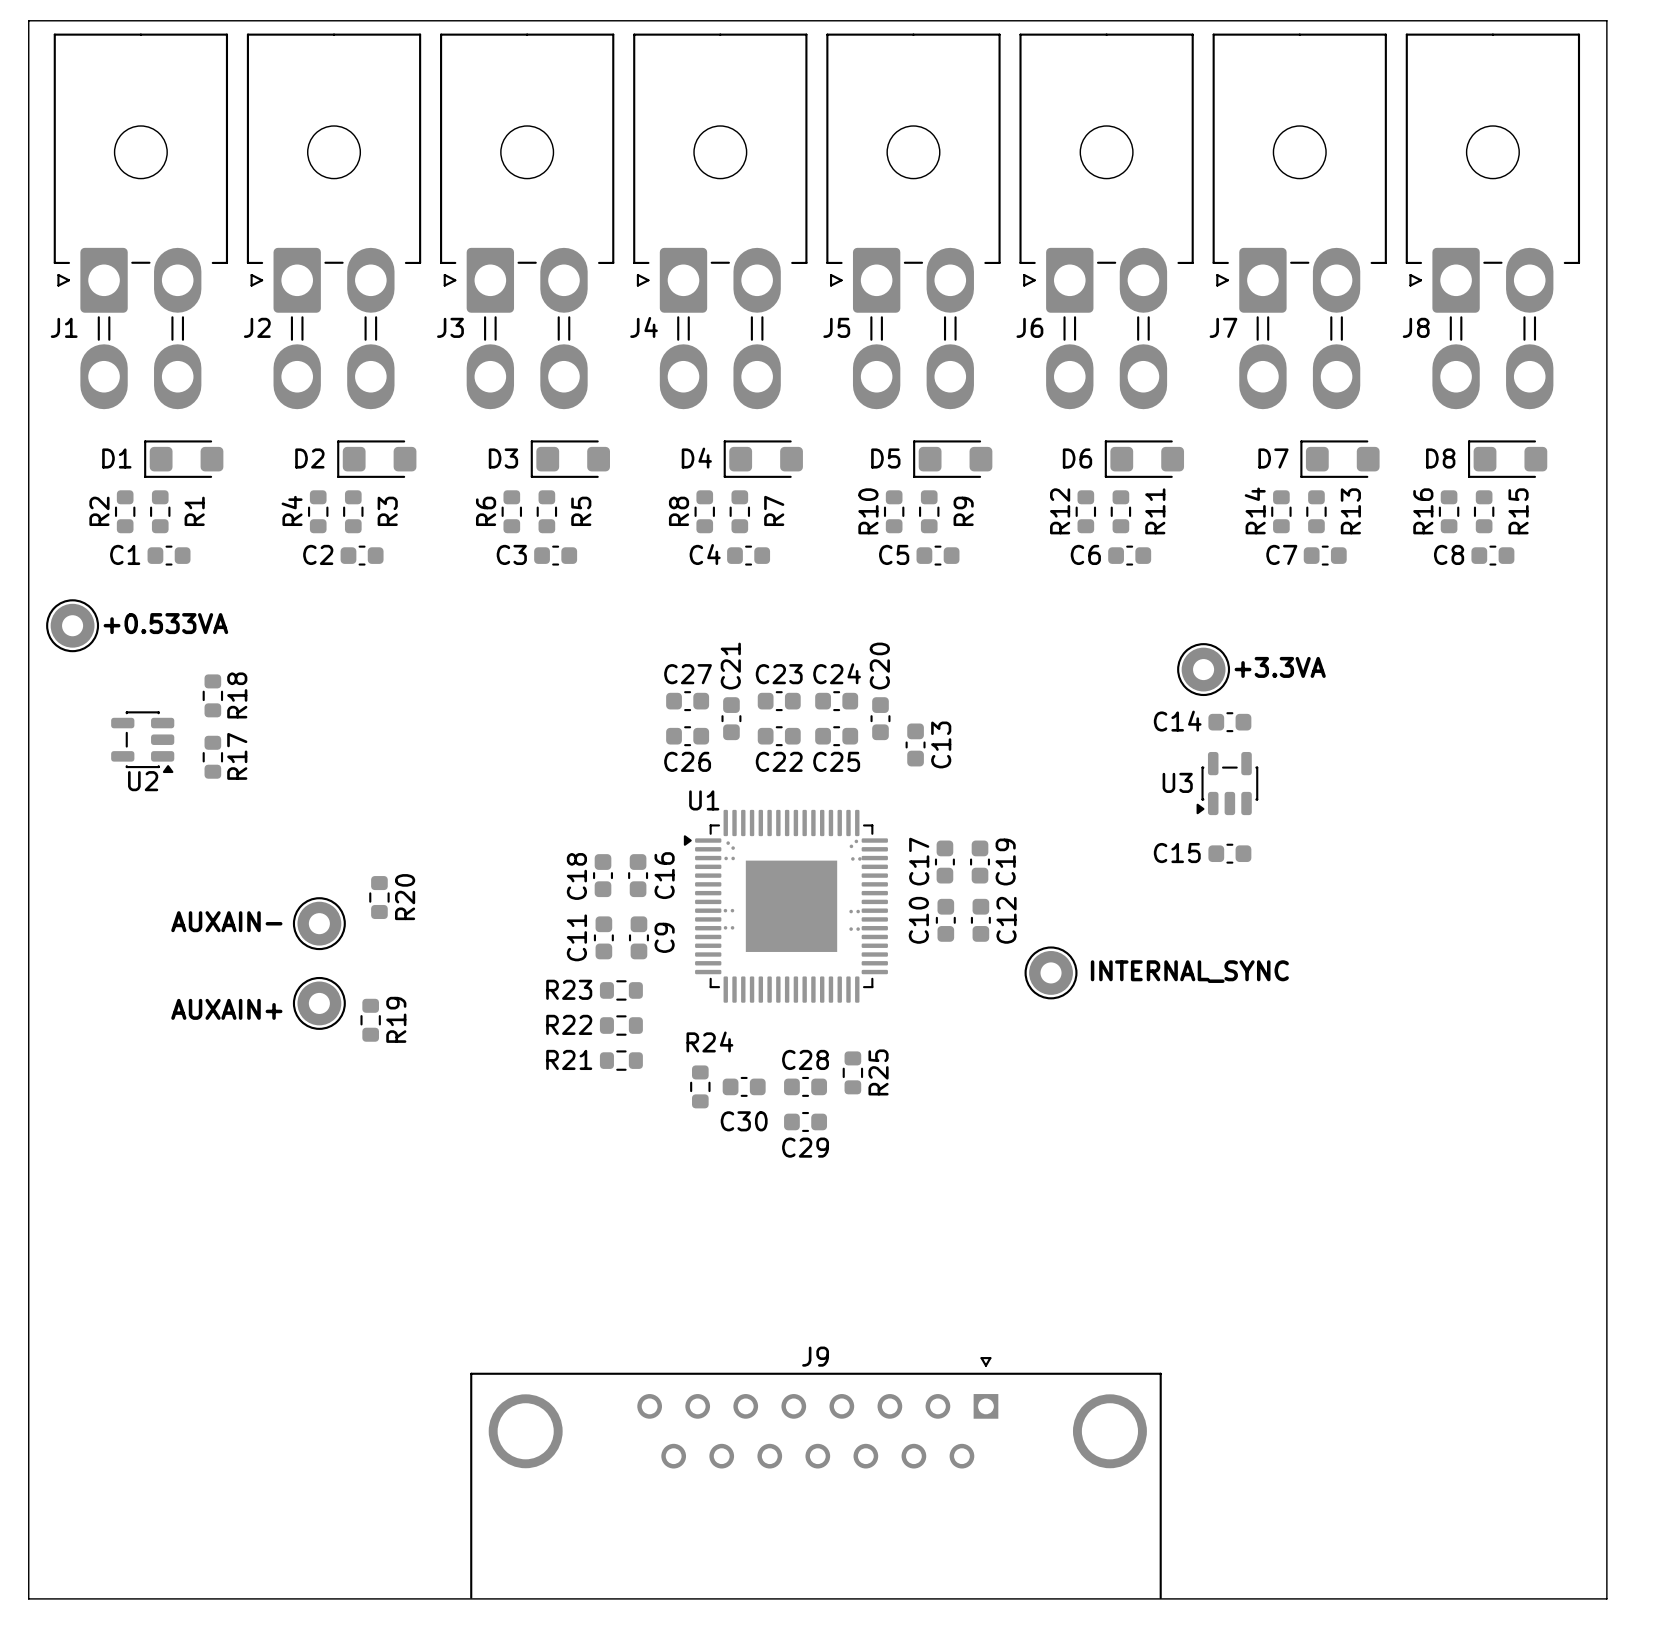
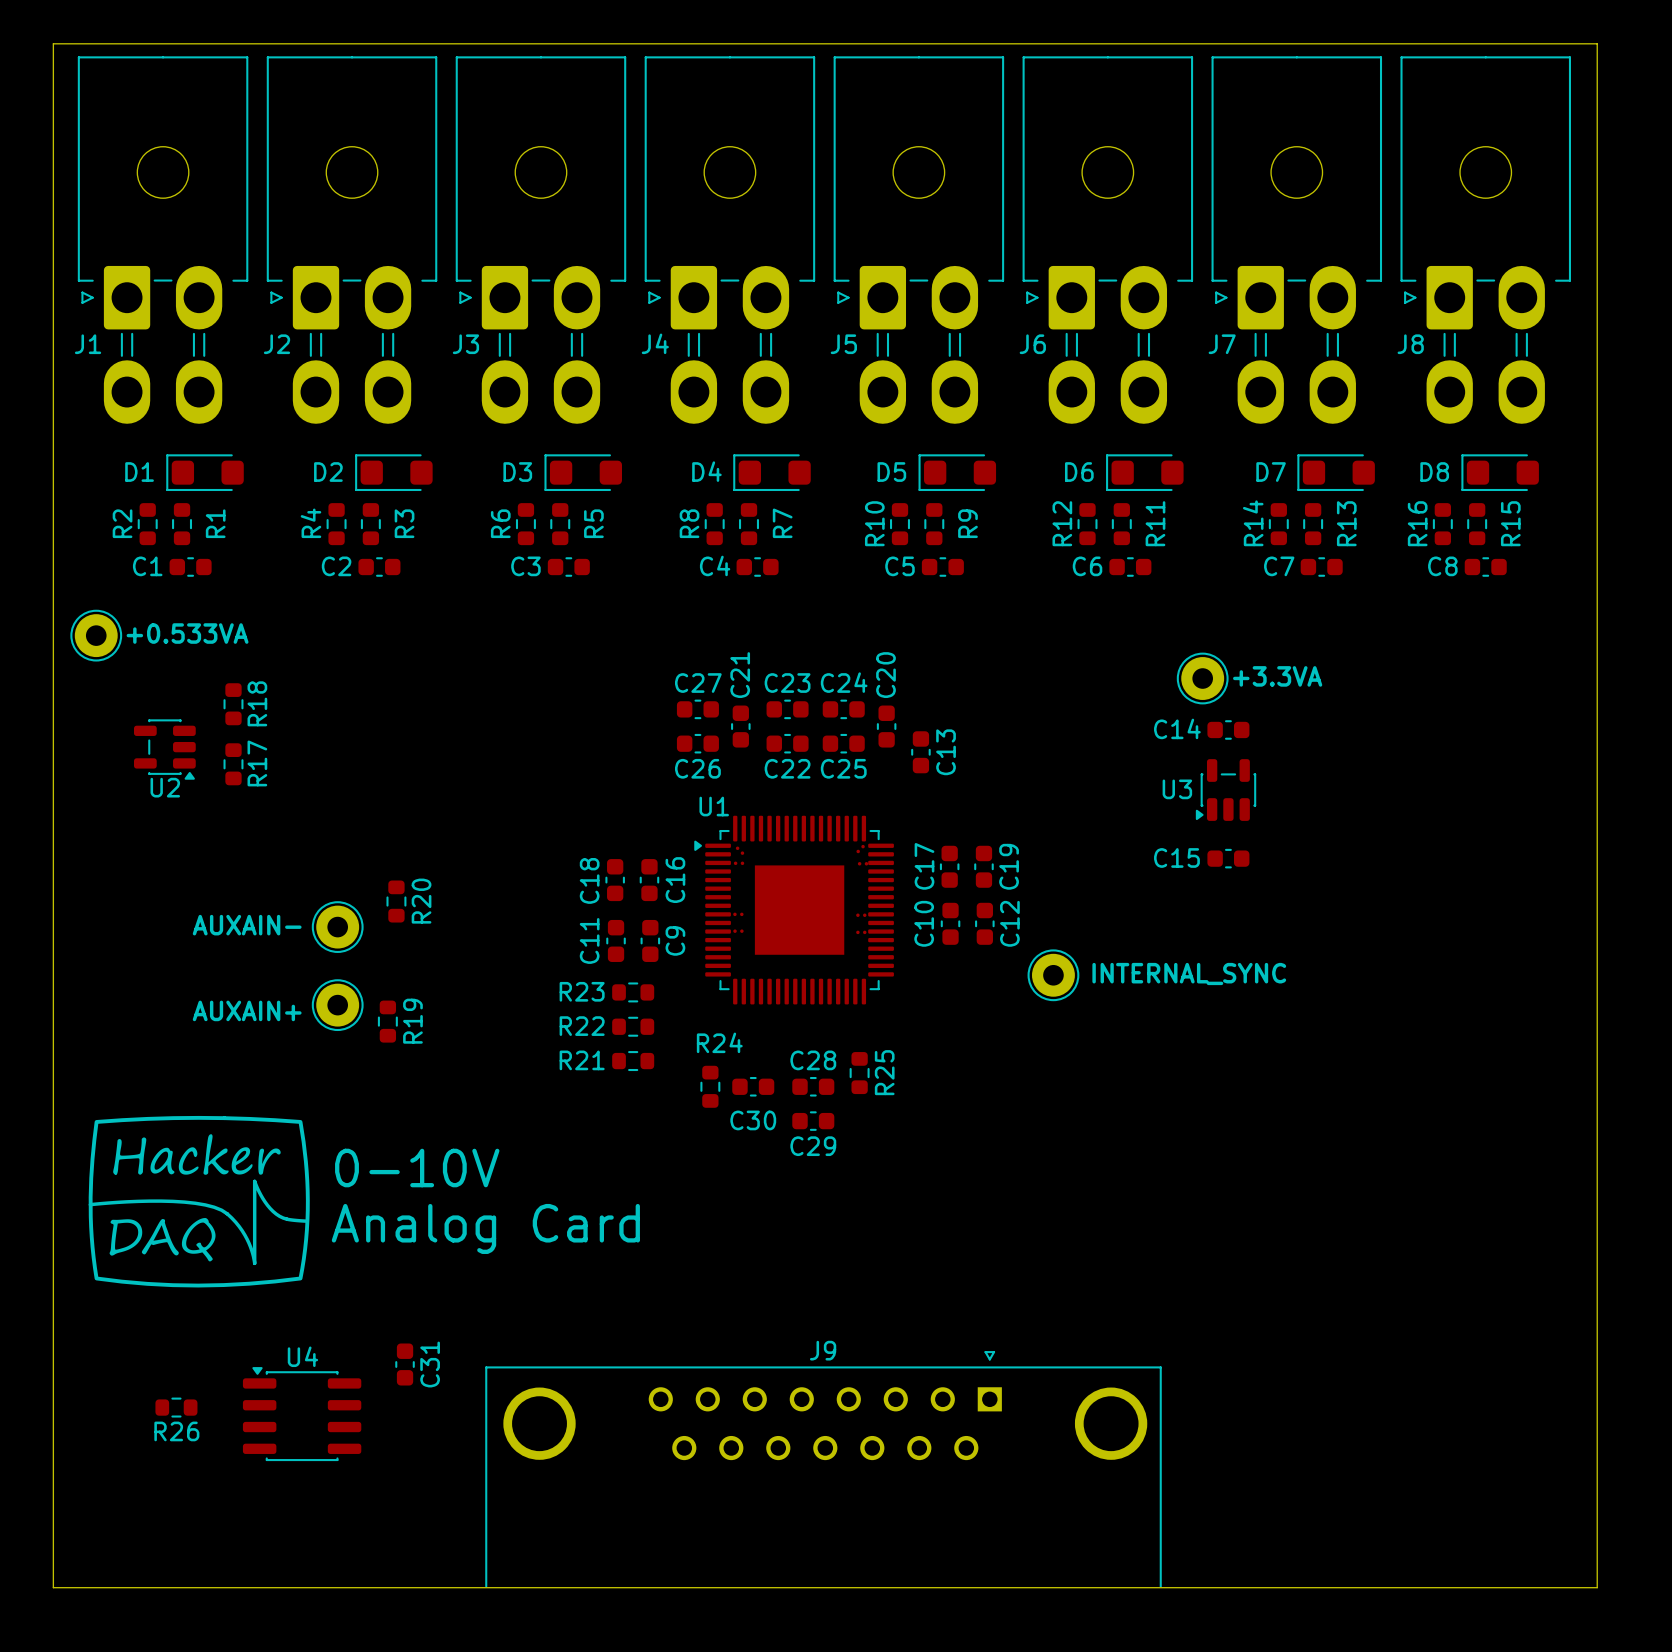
drawing: none -> [88, 1115, 310, 1288]
text: none -> 0-10V (417, 1168)
text: none -> Analog Card (485, 1228)
C31: none -> (405, 1364)
R26: none -> (176, 1407)
U4: none -> (302, 1414)

